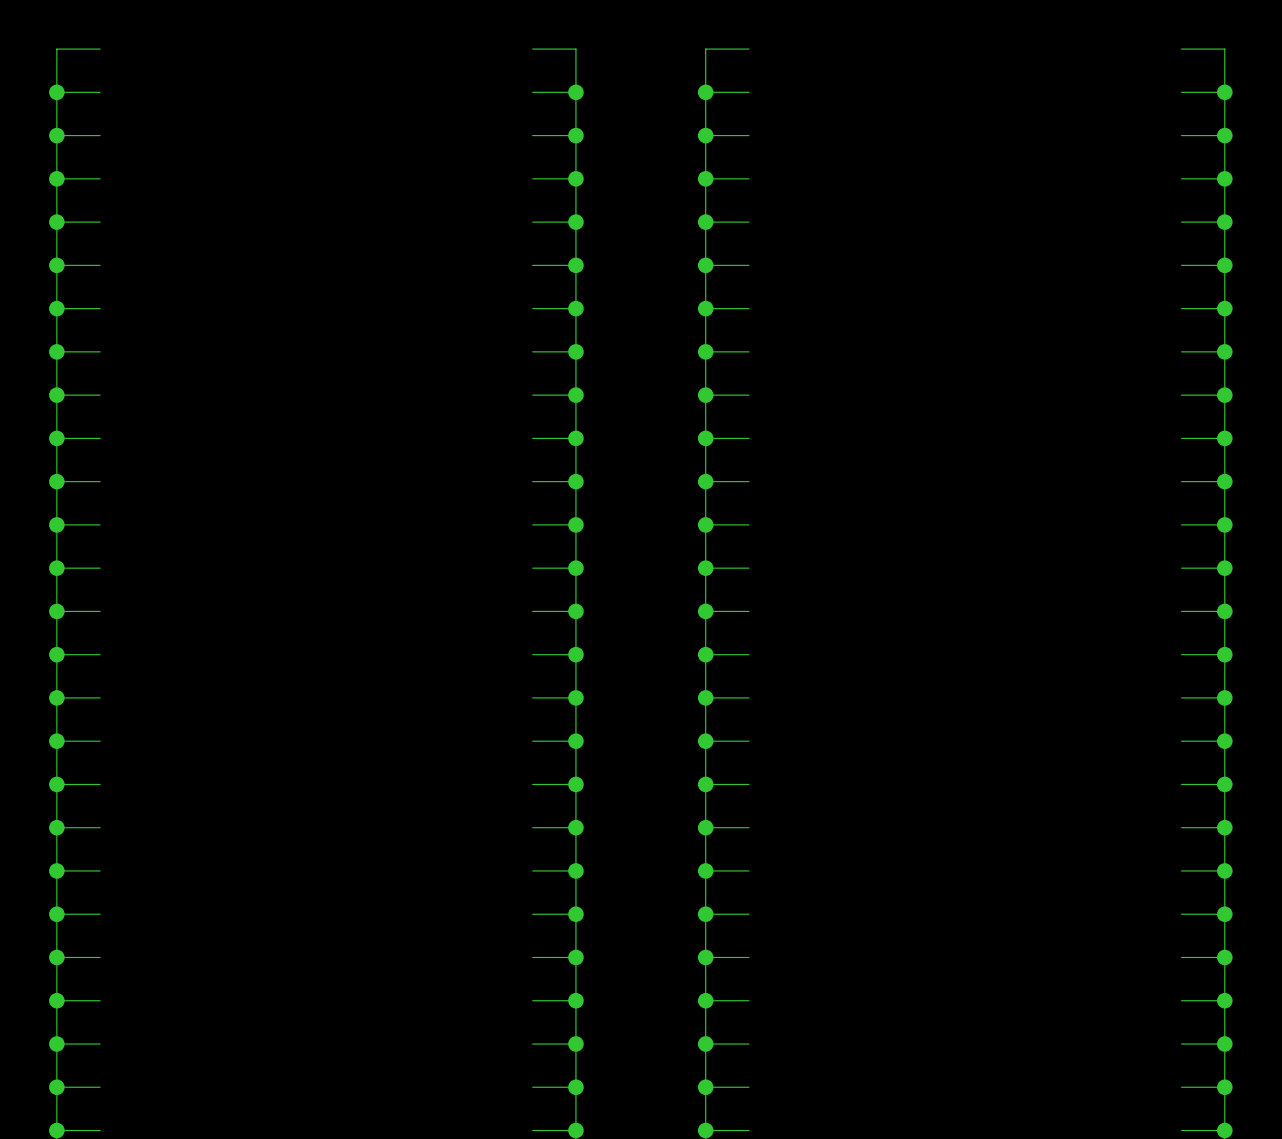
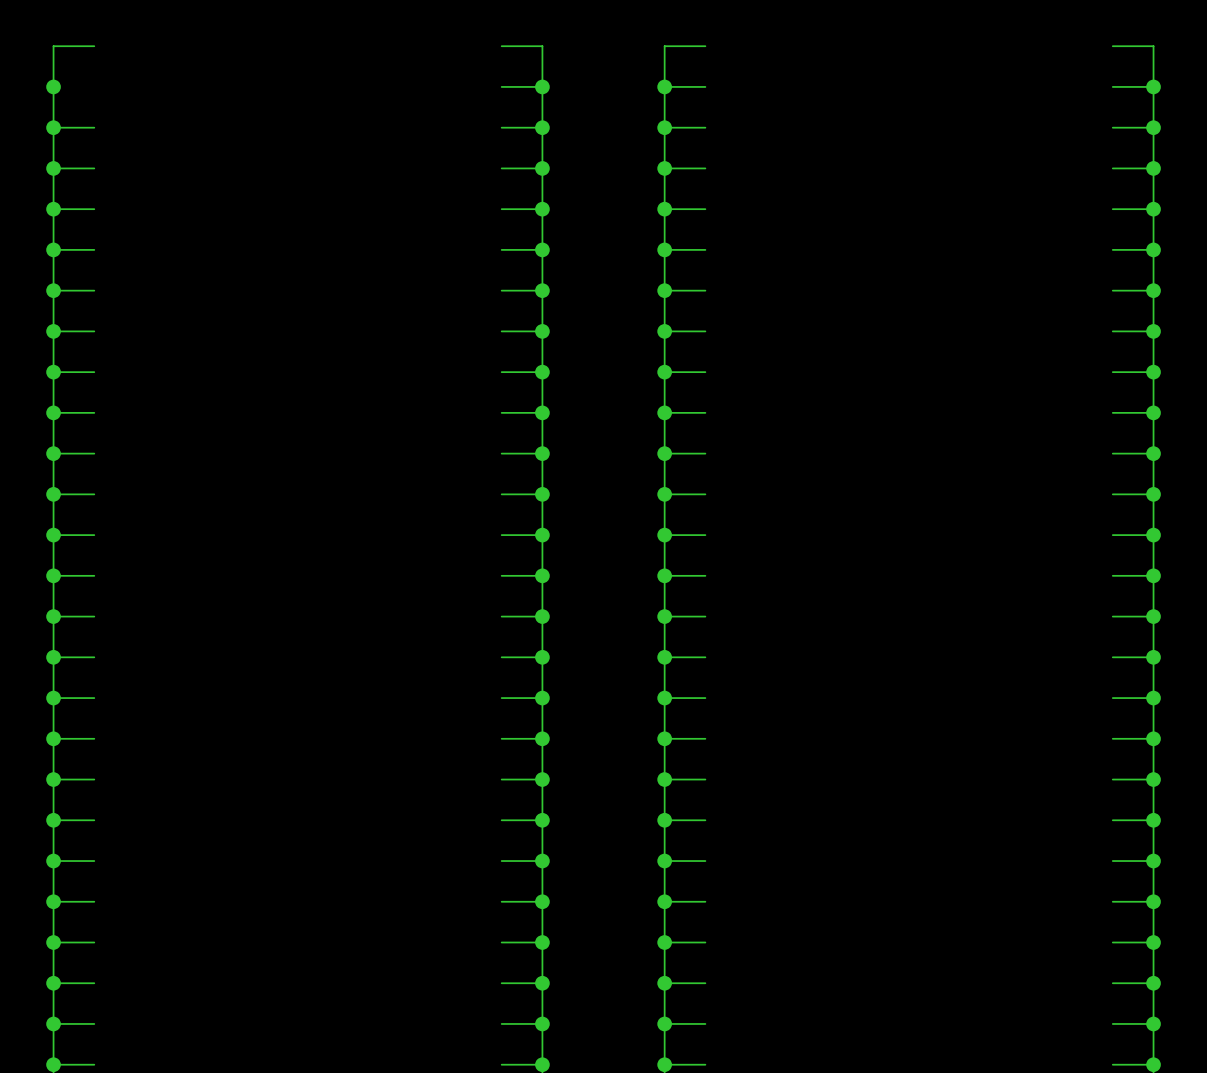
wire: (56, 92) (100, 92) -> none

